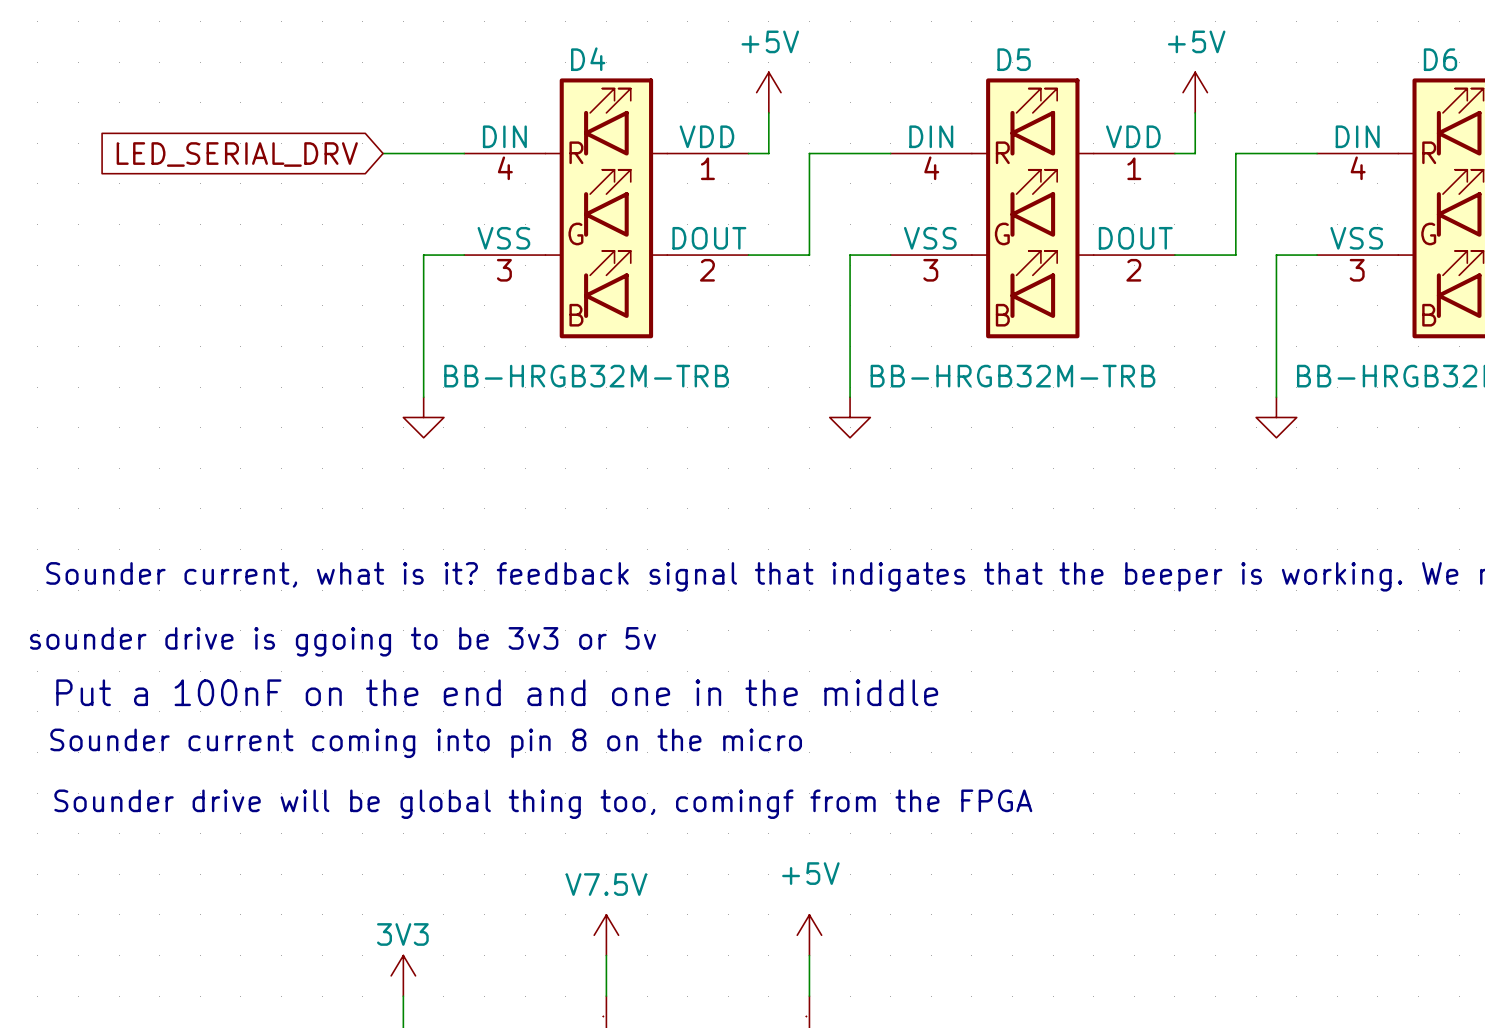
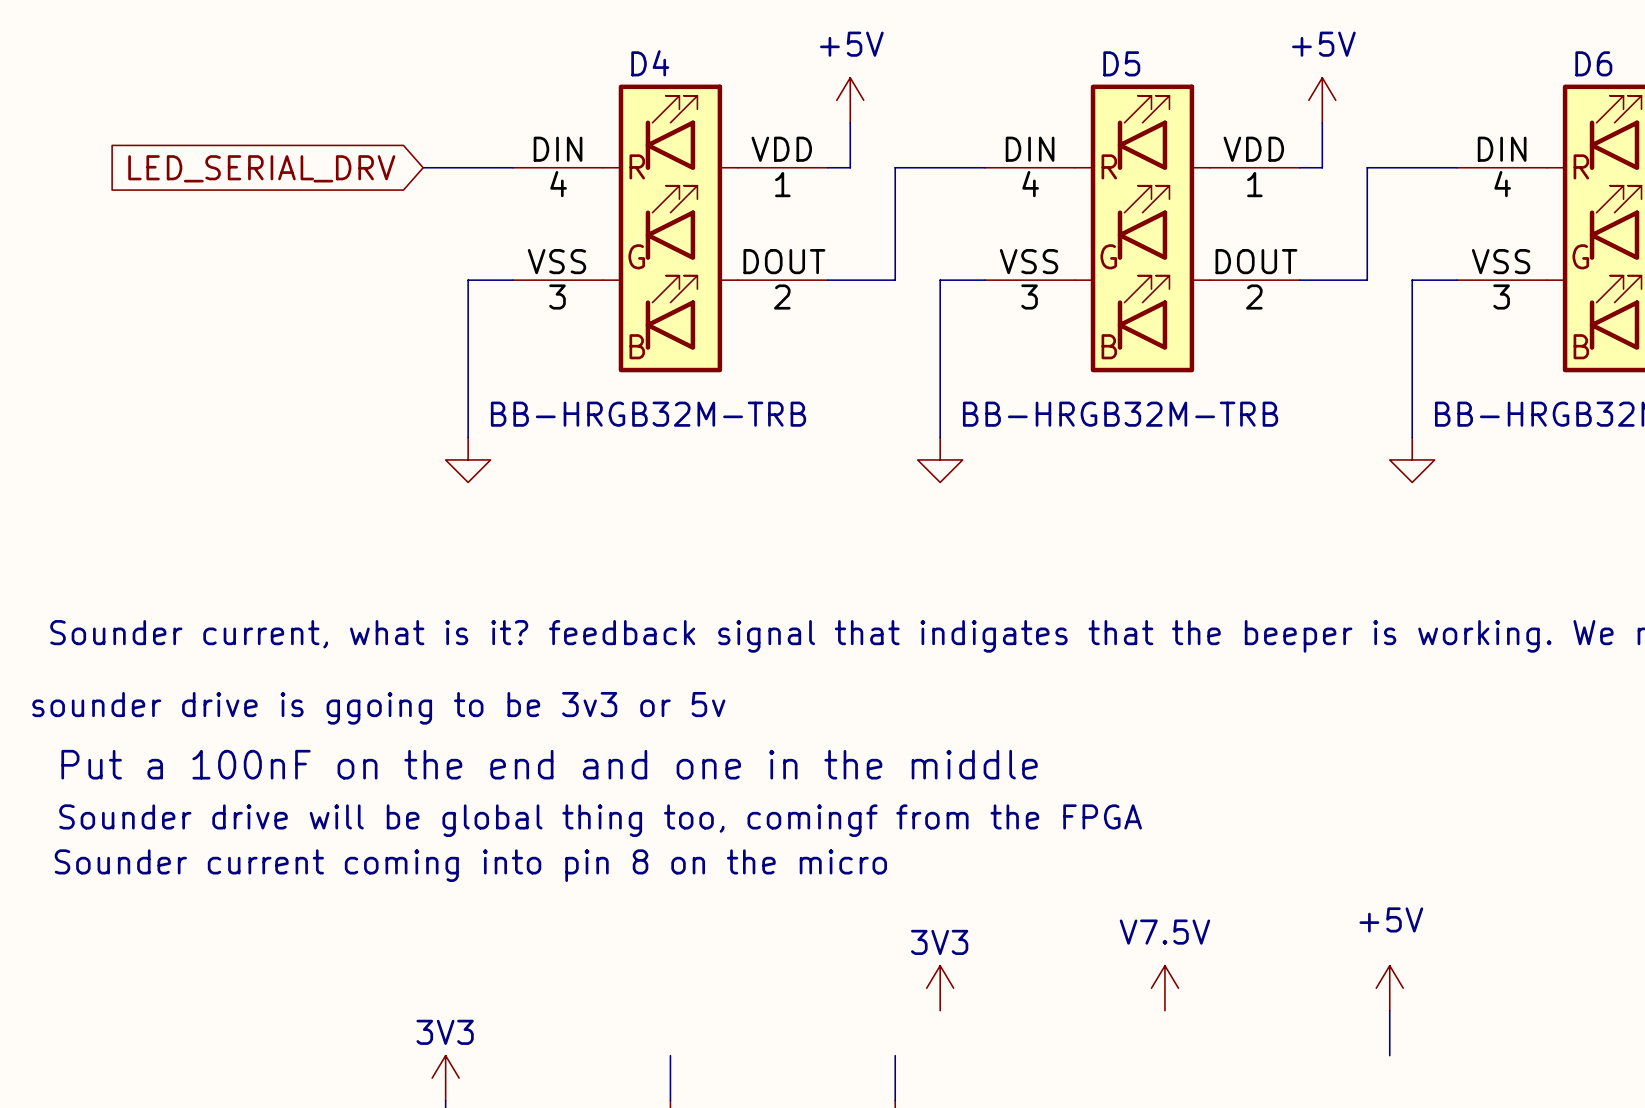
text position: Sounder current coming into pin 8 on the micro (426, 743) -> Sounder current coming into pin 8 on the micro (470, 865)
text position: Sounder drive will be global thing too, comingf from the FPGA (543, 804) -> Sounder drive will be global thing too, comingf from the FPGA (600, 820)
power symbol: none -> 3V3 (940, 988)
power symbol: none -> V7.5V (1164, 988)
power symbol: none -> +5V (1389, 988)
wire: none -> (1389, 1010) (1389, 1055)
power symbol: V7.5V (606, 935) -> none
power symbol: +5V (809, 935) -> none

